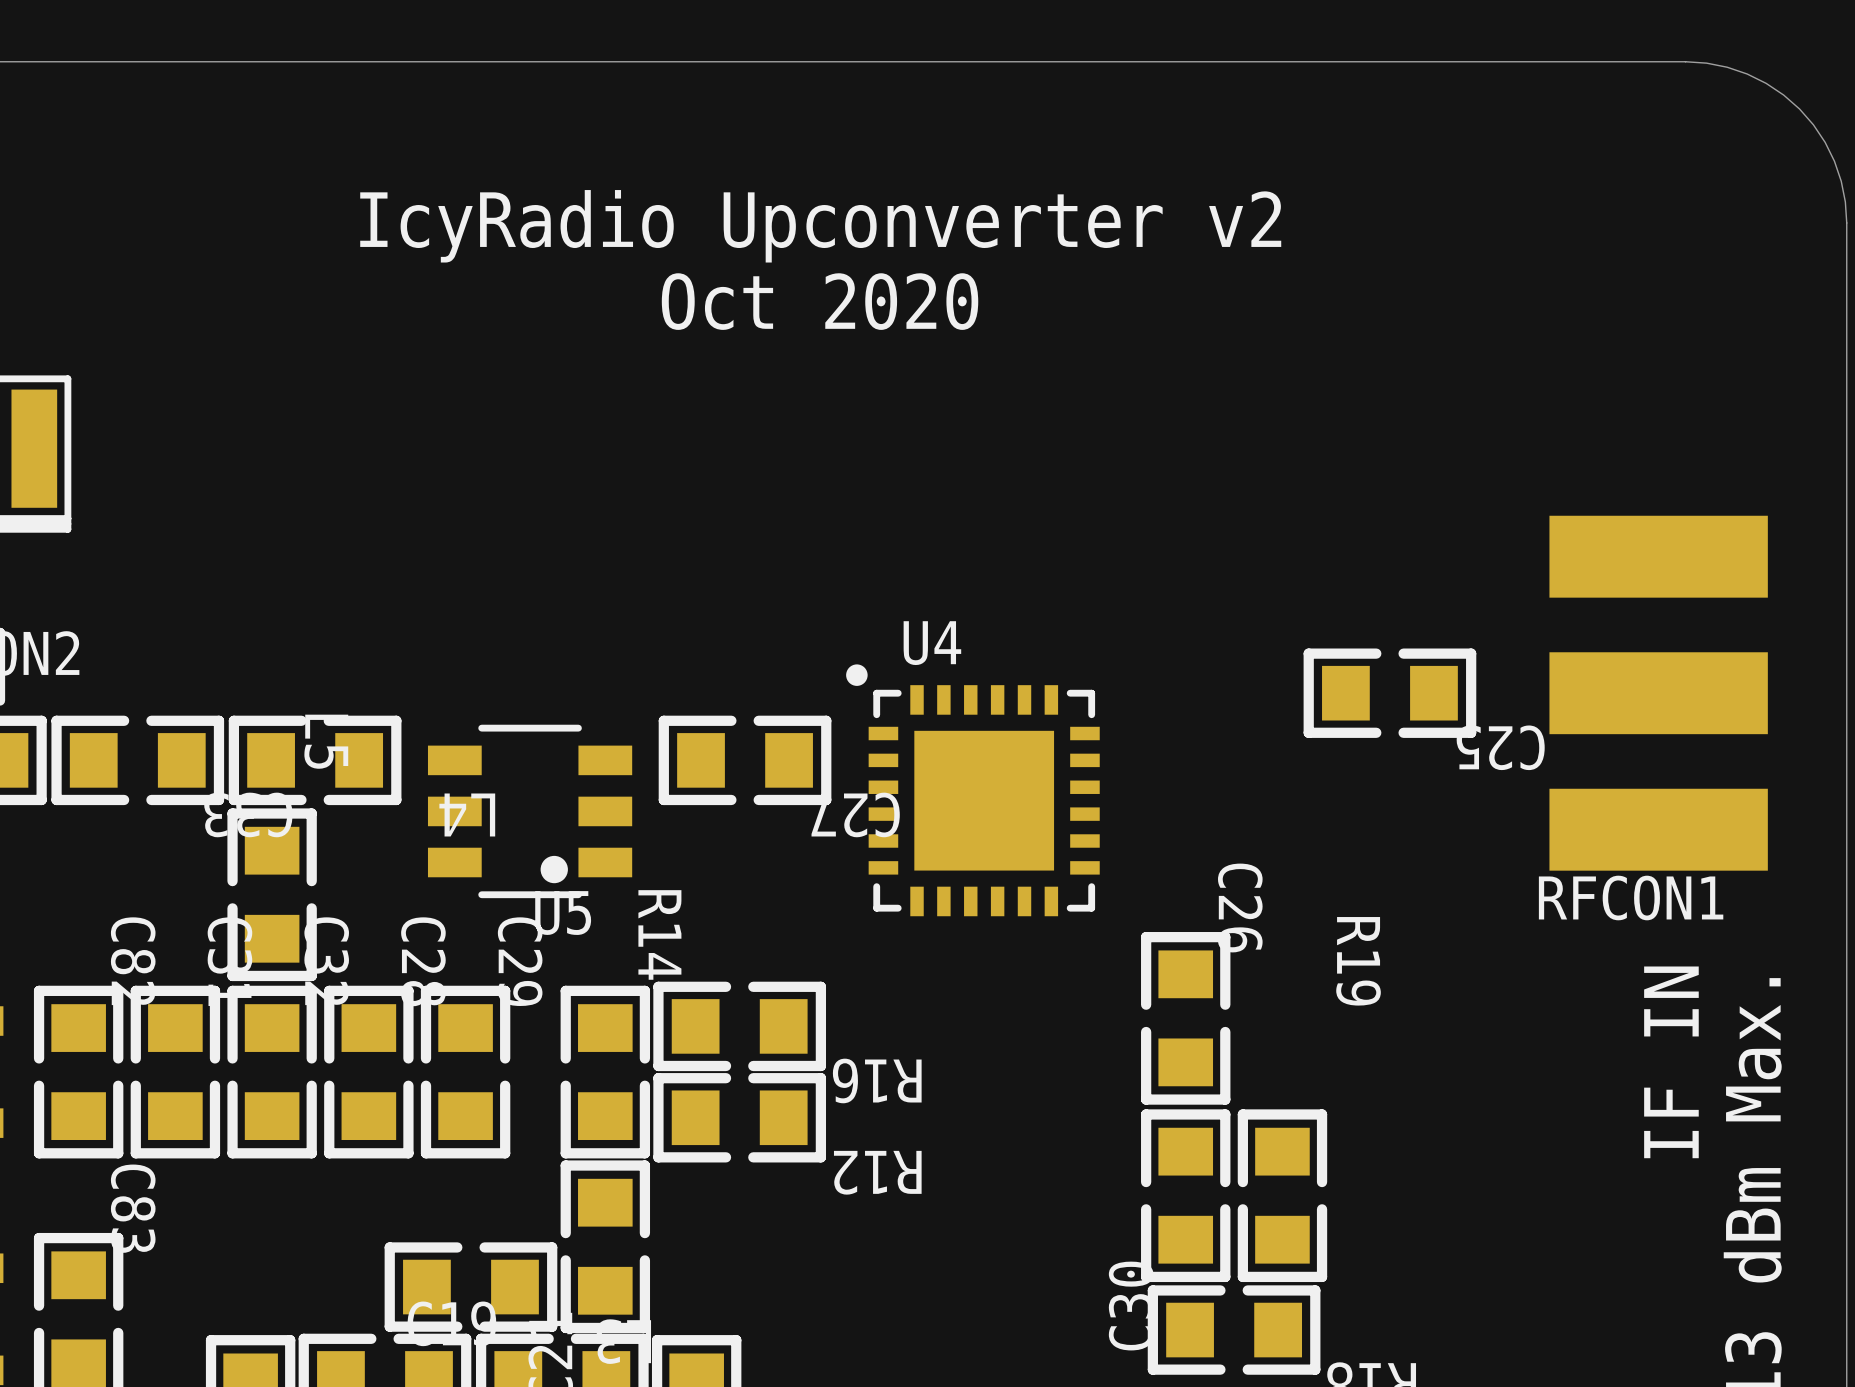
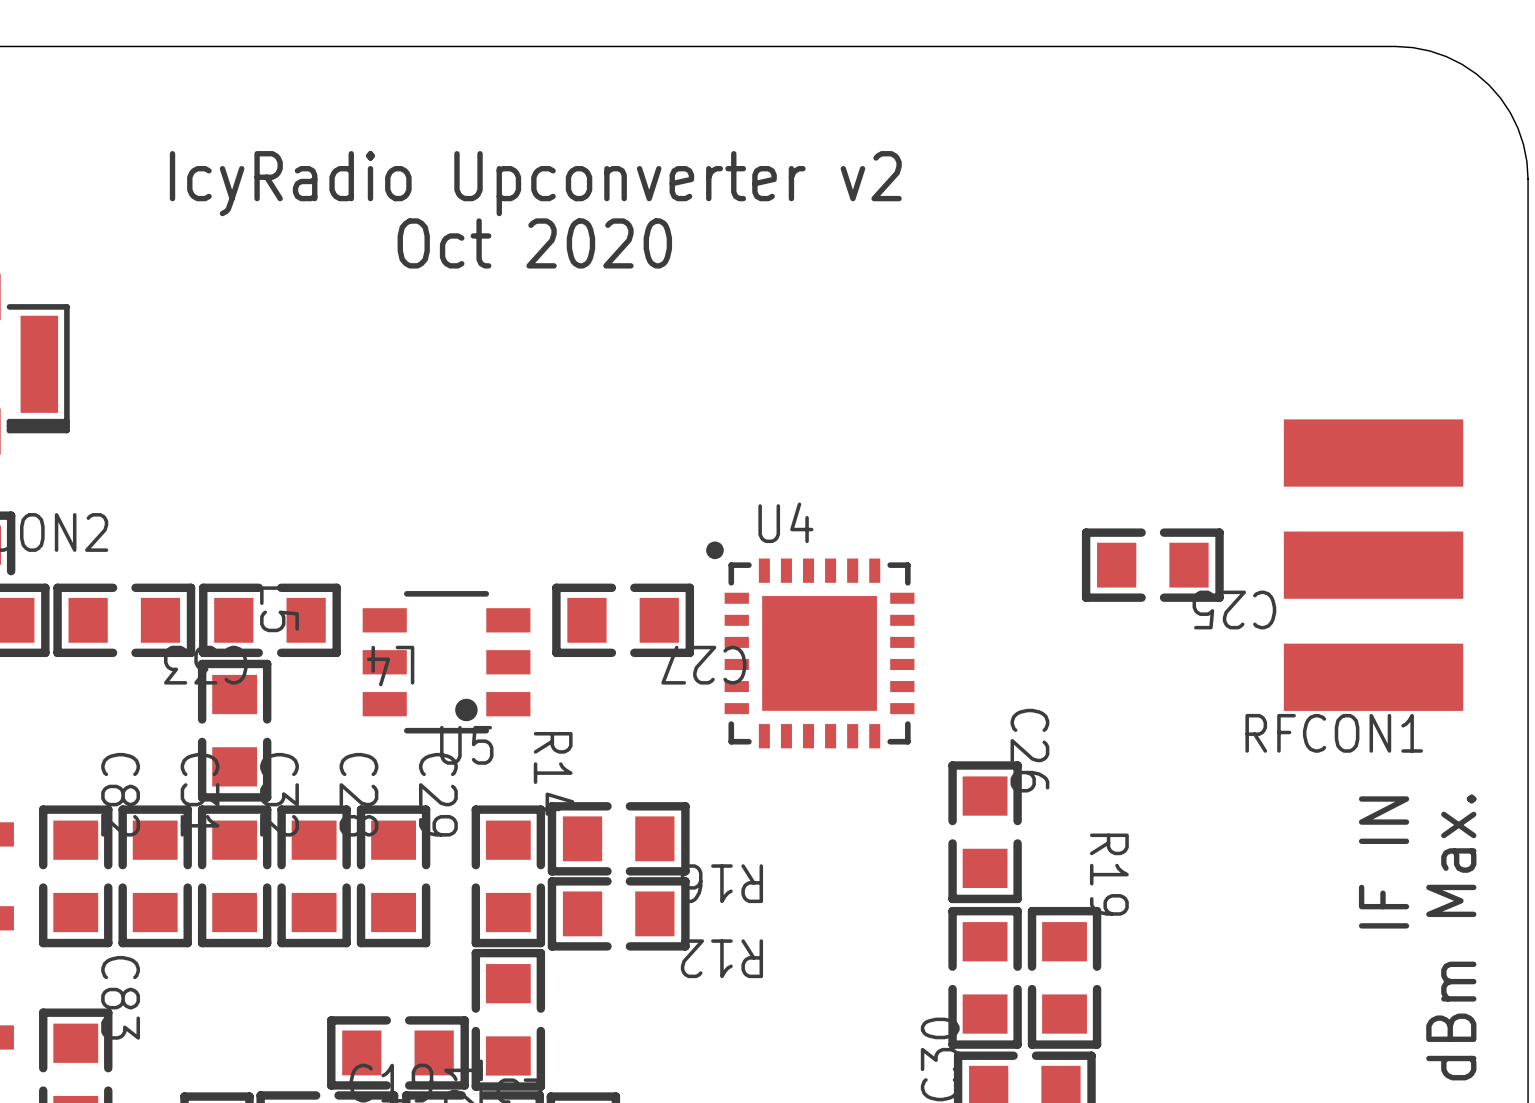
text position: IcyRadio Upconverter v2 (820, 226) -> IcyRadio Upconverter v2 (535, 183)
text position: Oct 2020 (820, 301) -> Oct 2020 (534, 243)
R19 name position: R19 (1358, 961) -> R19 (1109, 874)

